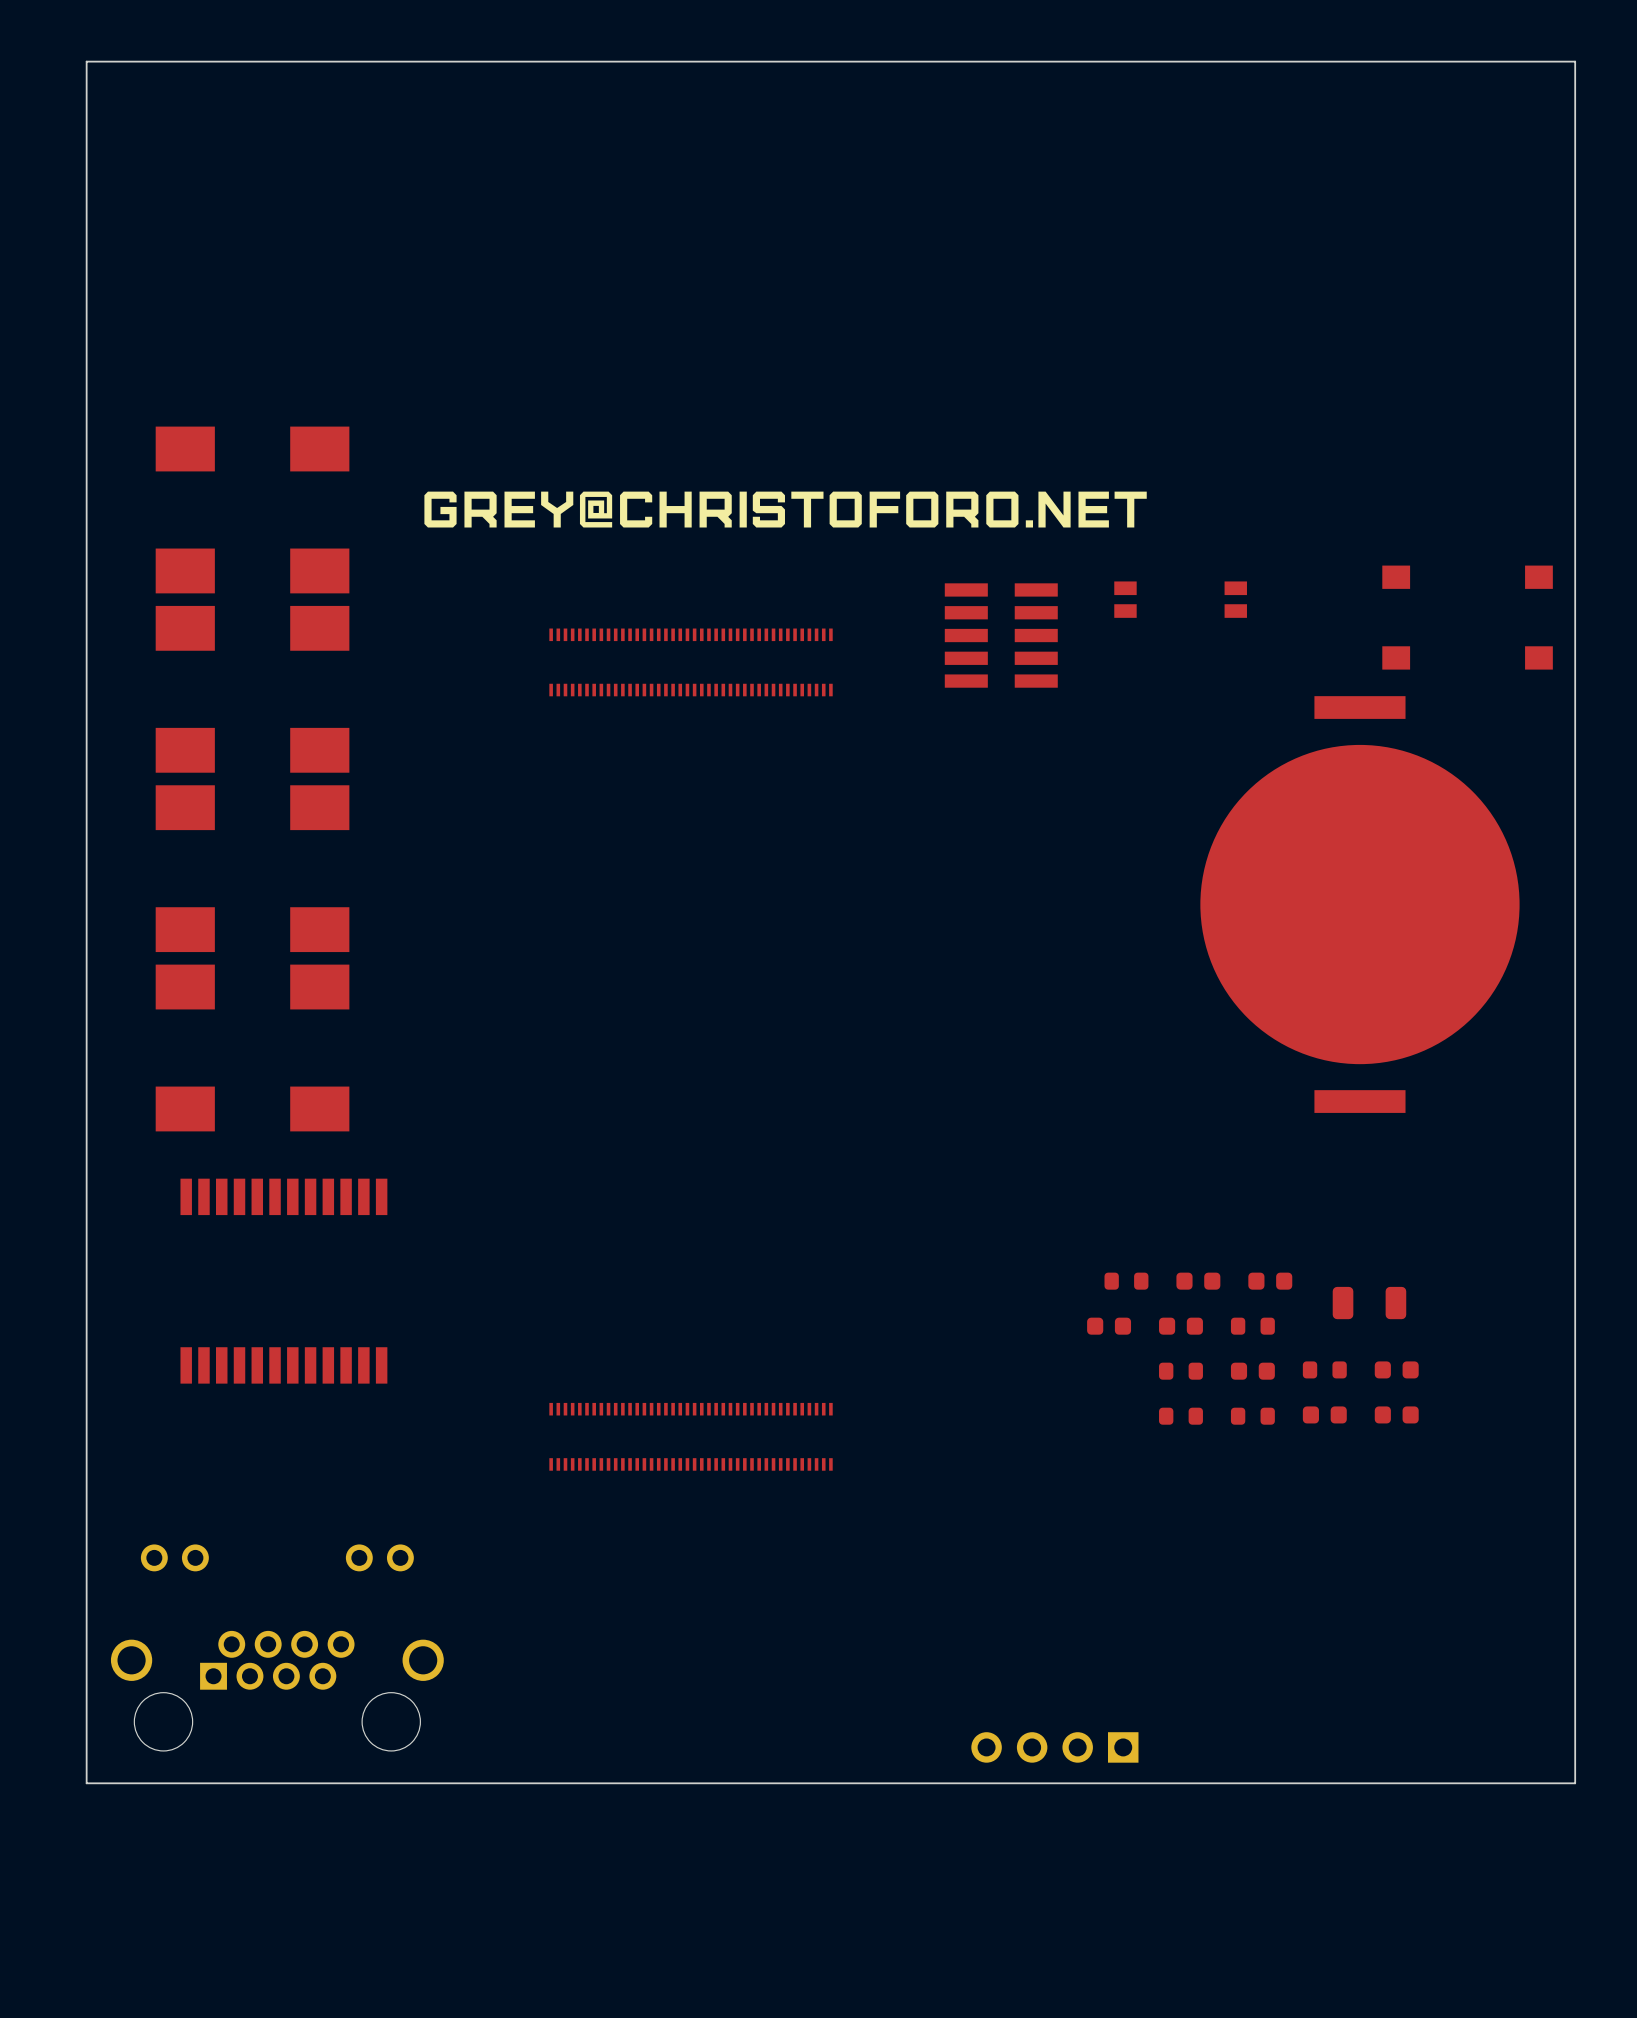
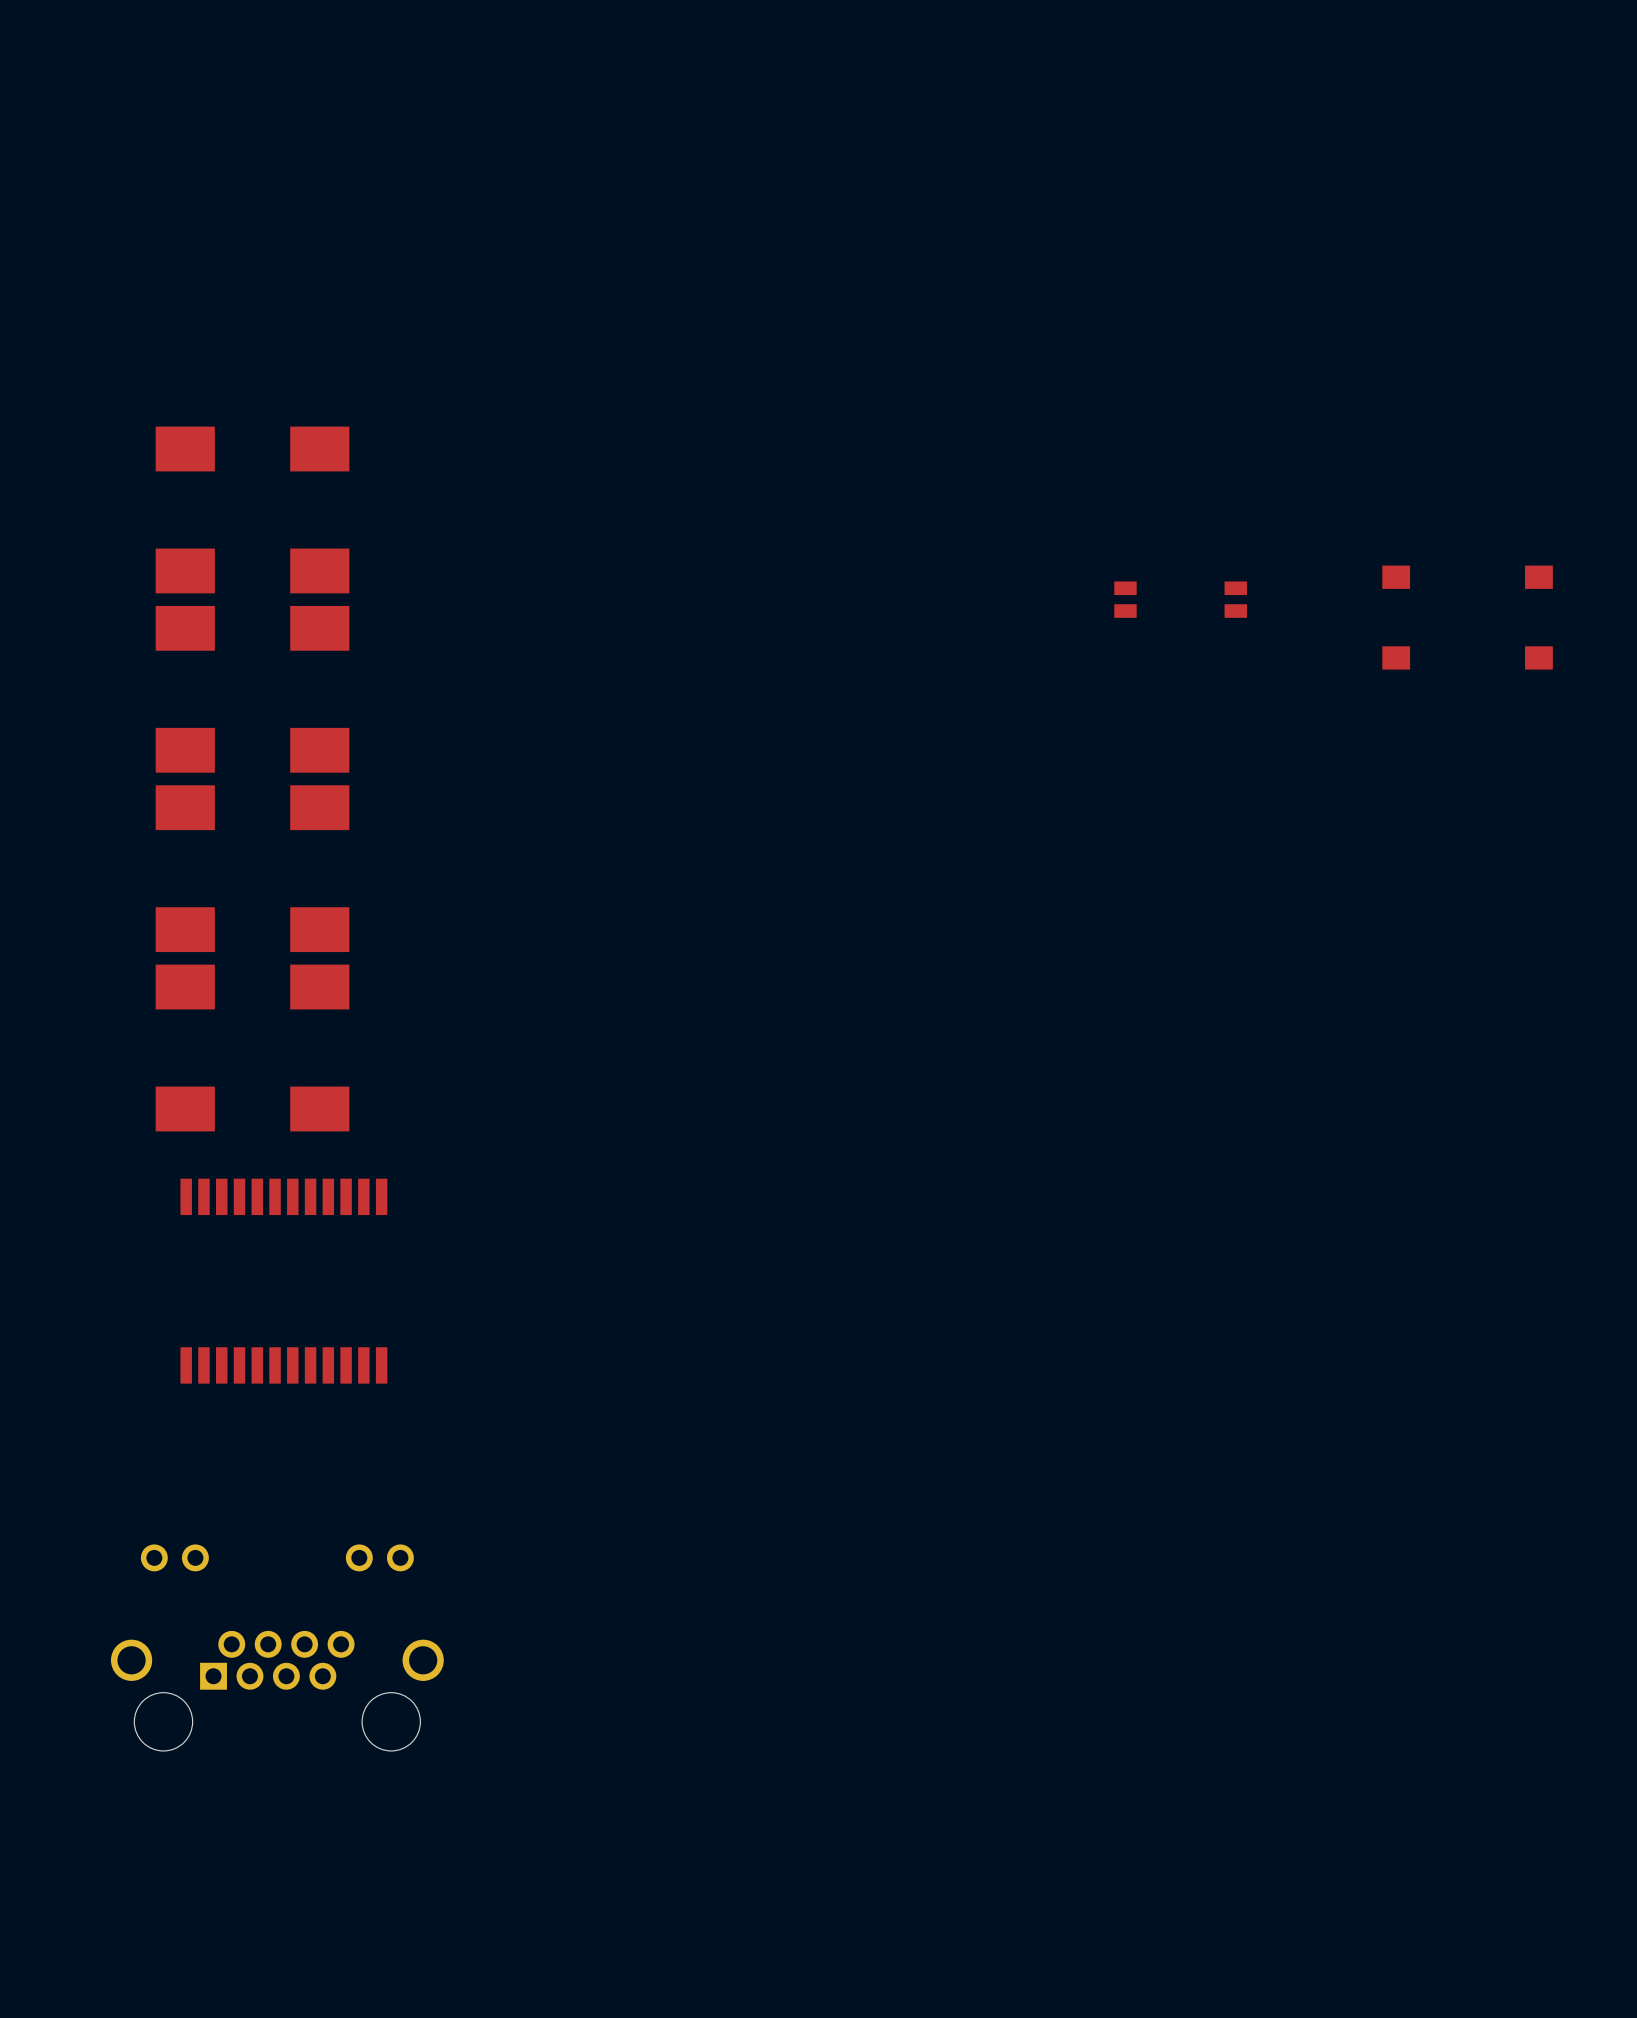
board edge: (1575, 61) (86, 61) (86, 1783) (1575, 1783) (1575, 61) -> none
drawing: [424, 491, 1147, 528] -> none
part: (1001, 635) -> none
part: (691, 662) -> none
part: (1359, 904) -> none
part: (1126, 1281) -> none
part: (1198, 1281) -> none
part: (1270, 1281) -> none
part: (1369, 1303) -> none
part: (1109, 1326) -> none
part: (1180, 1326) -> none
part: (1252, 1326) -> none
part: (1324, 1369) -> none
part: (1396, 1369) -> none
part: (1180, 1371) -> none
part: (1252, 1371) -> none
part: (1324, 1414) -> none
part: (1396, 1414) -> none
part: (1180, 1416) -> none
part: (1252, 1416) -> none
part: (691, 1436) -> none
part: (1054, 1747) -> none

